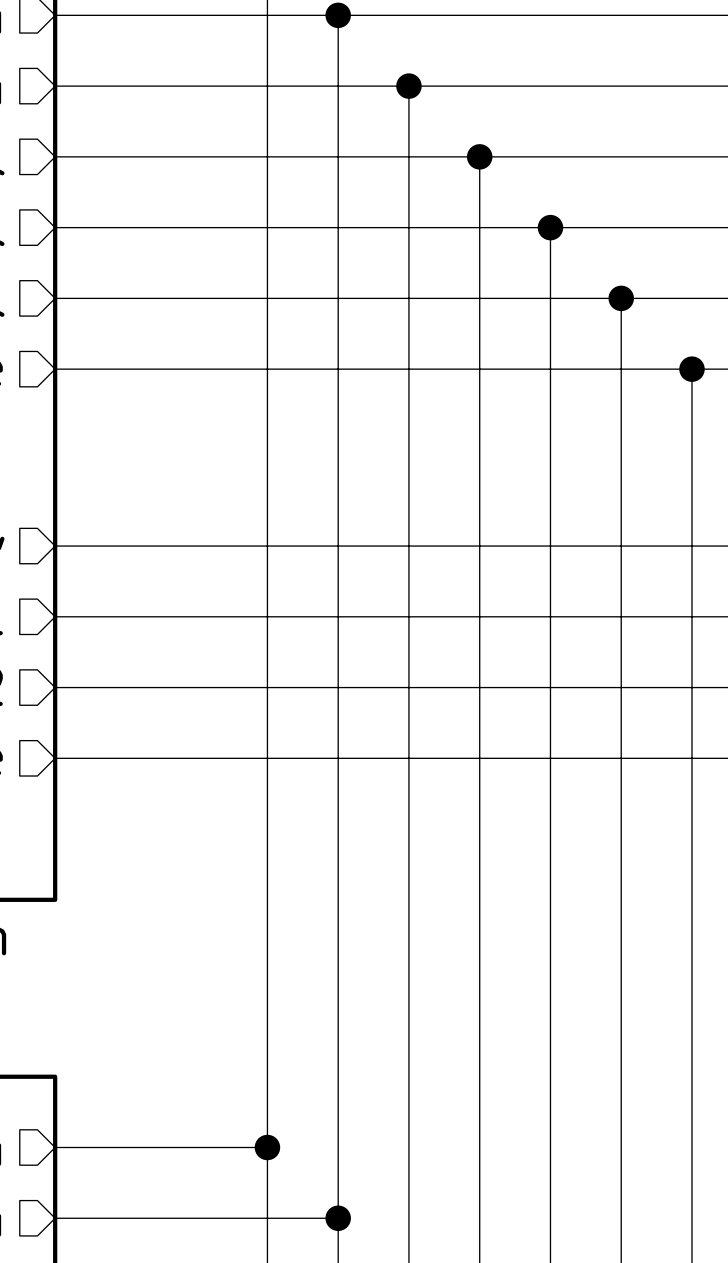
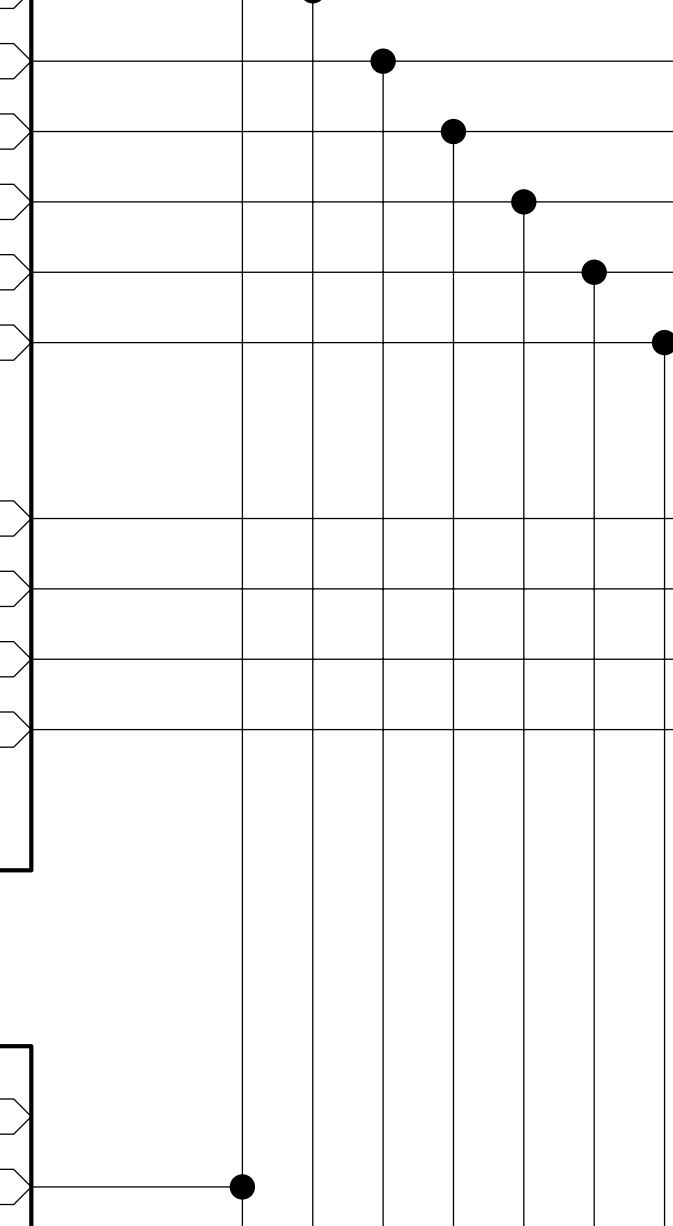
wire: (55, 1147) (267, 1147) -> none
junction: (267, 1147) -> none
wire: (267, 1218) (338, 1218) -> none
junction: none -> (242, 1186)
junction: (338, 1218) -> none

